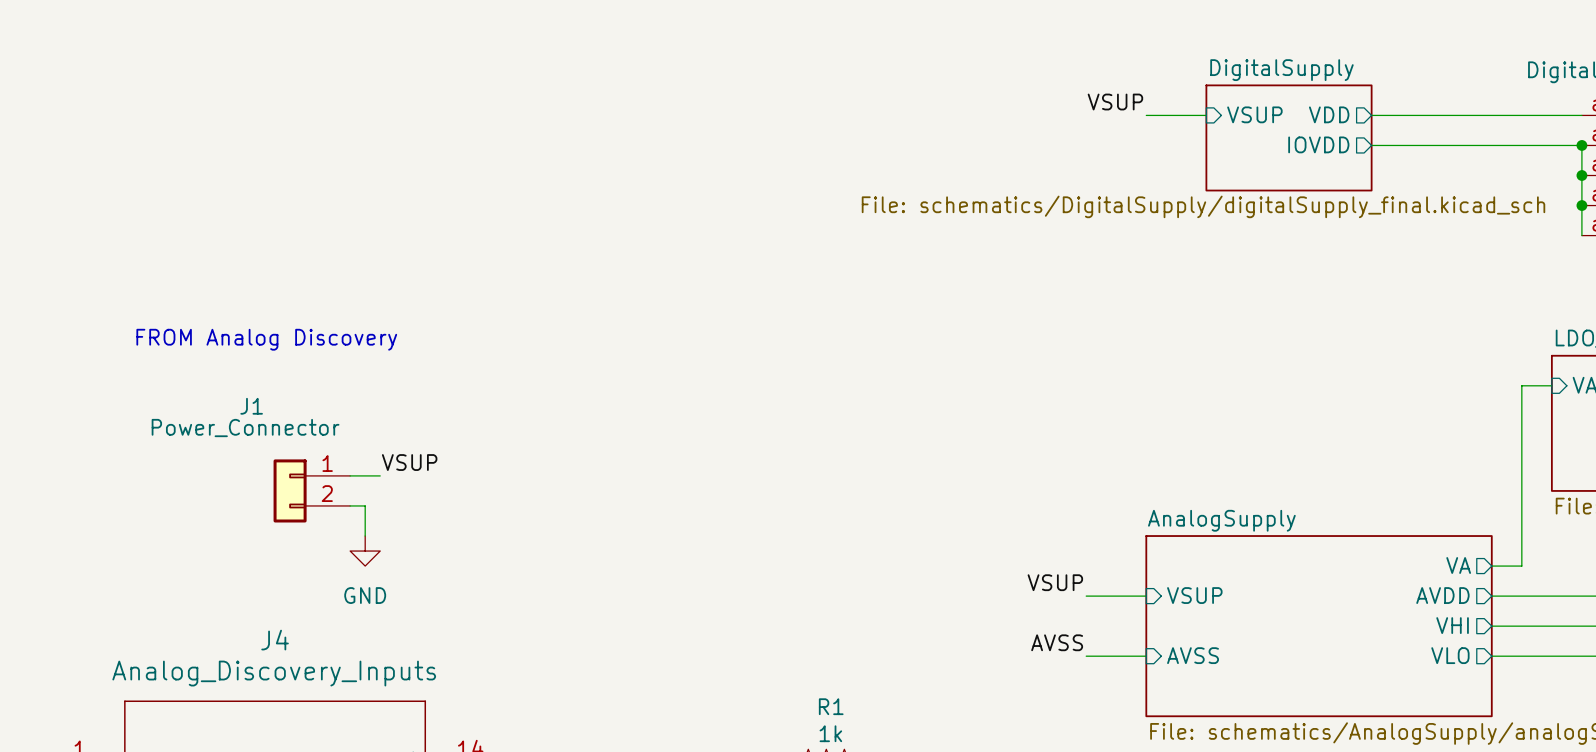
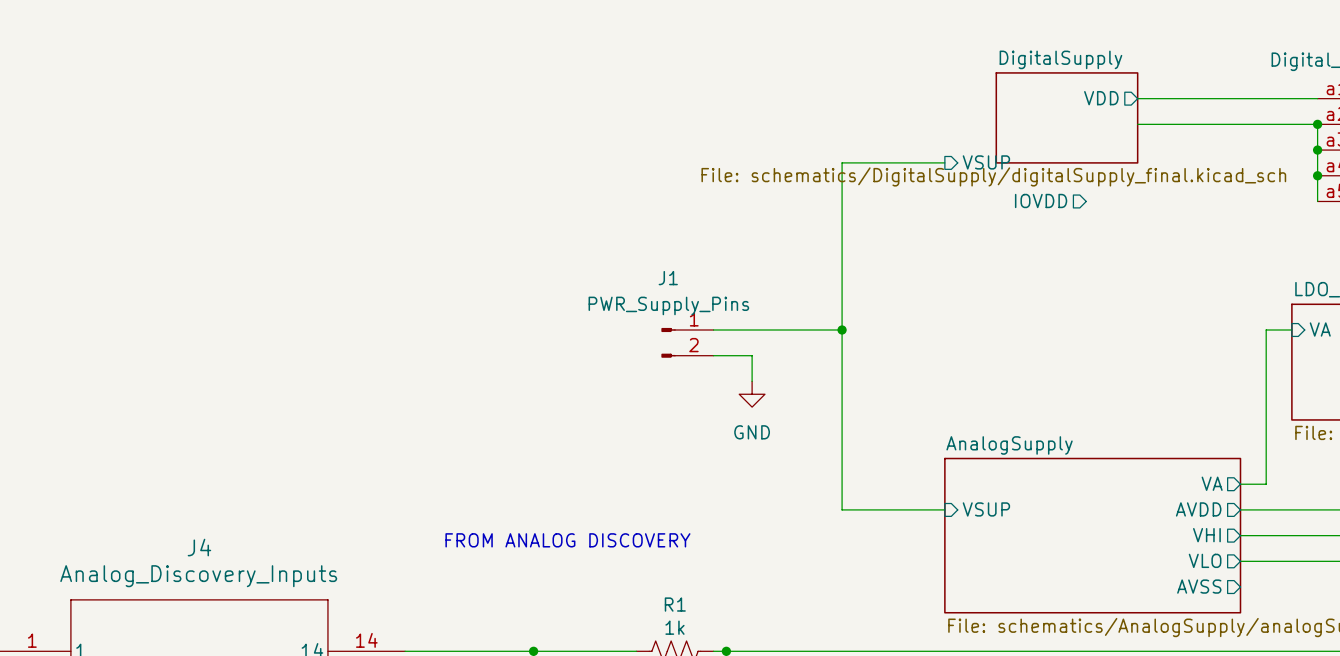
label: VSUP (1115, 102) -> none
sheet pin position: VSUP (1254, 114) -> VSUP (986, 162)
wire: (1146, 115) (1206, 115) -> none
sheet pin position: IOVDD (1318, 144) -> IOVDD (1041, 200)
wire: none -> (944, 162) (842, 162) (842, 509) (893, 509)
text: FROM Analog Discovery (266, 339) -> none
wire: none -> (713, 329) (842, 329)
junction: none -> (842, 329)
J1 name position: J1 (251, 406) -> J1 (668, 278)
wire: none -> (713, 355) (752, 355) (752, 381)
J1 value: Power_Connector (245, 428) -> PWR_Supply_Pins (668, 305)
J1 symbol: [273, 459, 351, 523] -> [661, 327, 714, 358]
power symbol: none -> GND (752, 394)
label: VSUP (409, 462) -> none
wire: (350, 475) (380, 475) -> none
wire: (350, 505) (365, 505) (365, 536) -> none
power symbol: GND (365, 551) -> none
label: VSUP (1055, 582) -> none
text: none -> FROM ANALOG DISCOVERY (567, 540)
label: AVSS (1057, 642) -> none
sheet pin: AVSS (1193, 655) -> none
wire: (1086, 656) (1146, 656) -> none
sheet pin: none -> AVSS (1199, 586)

